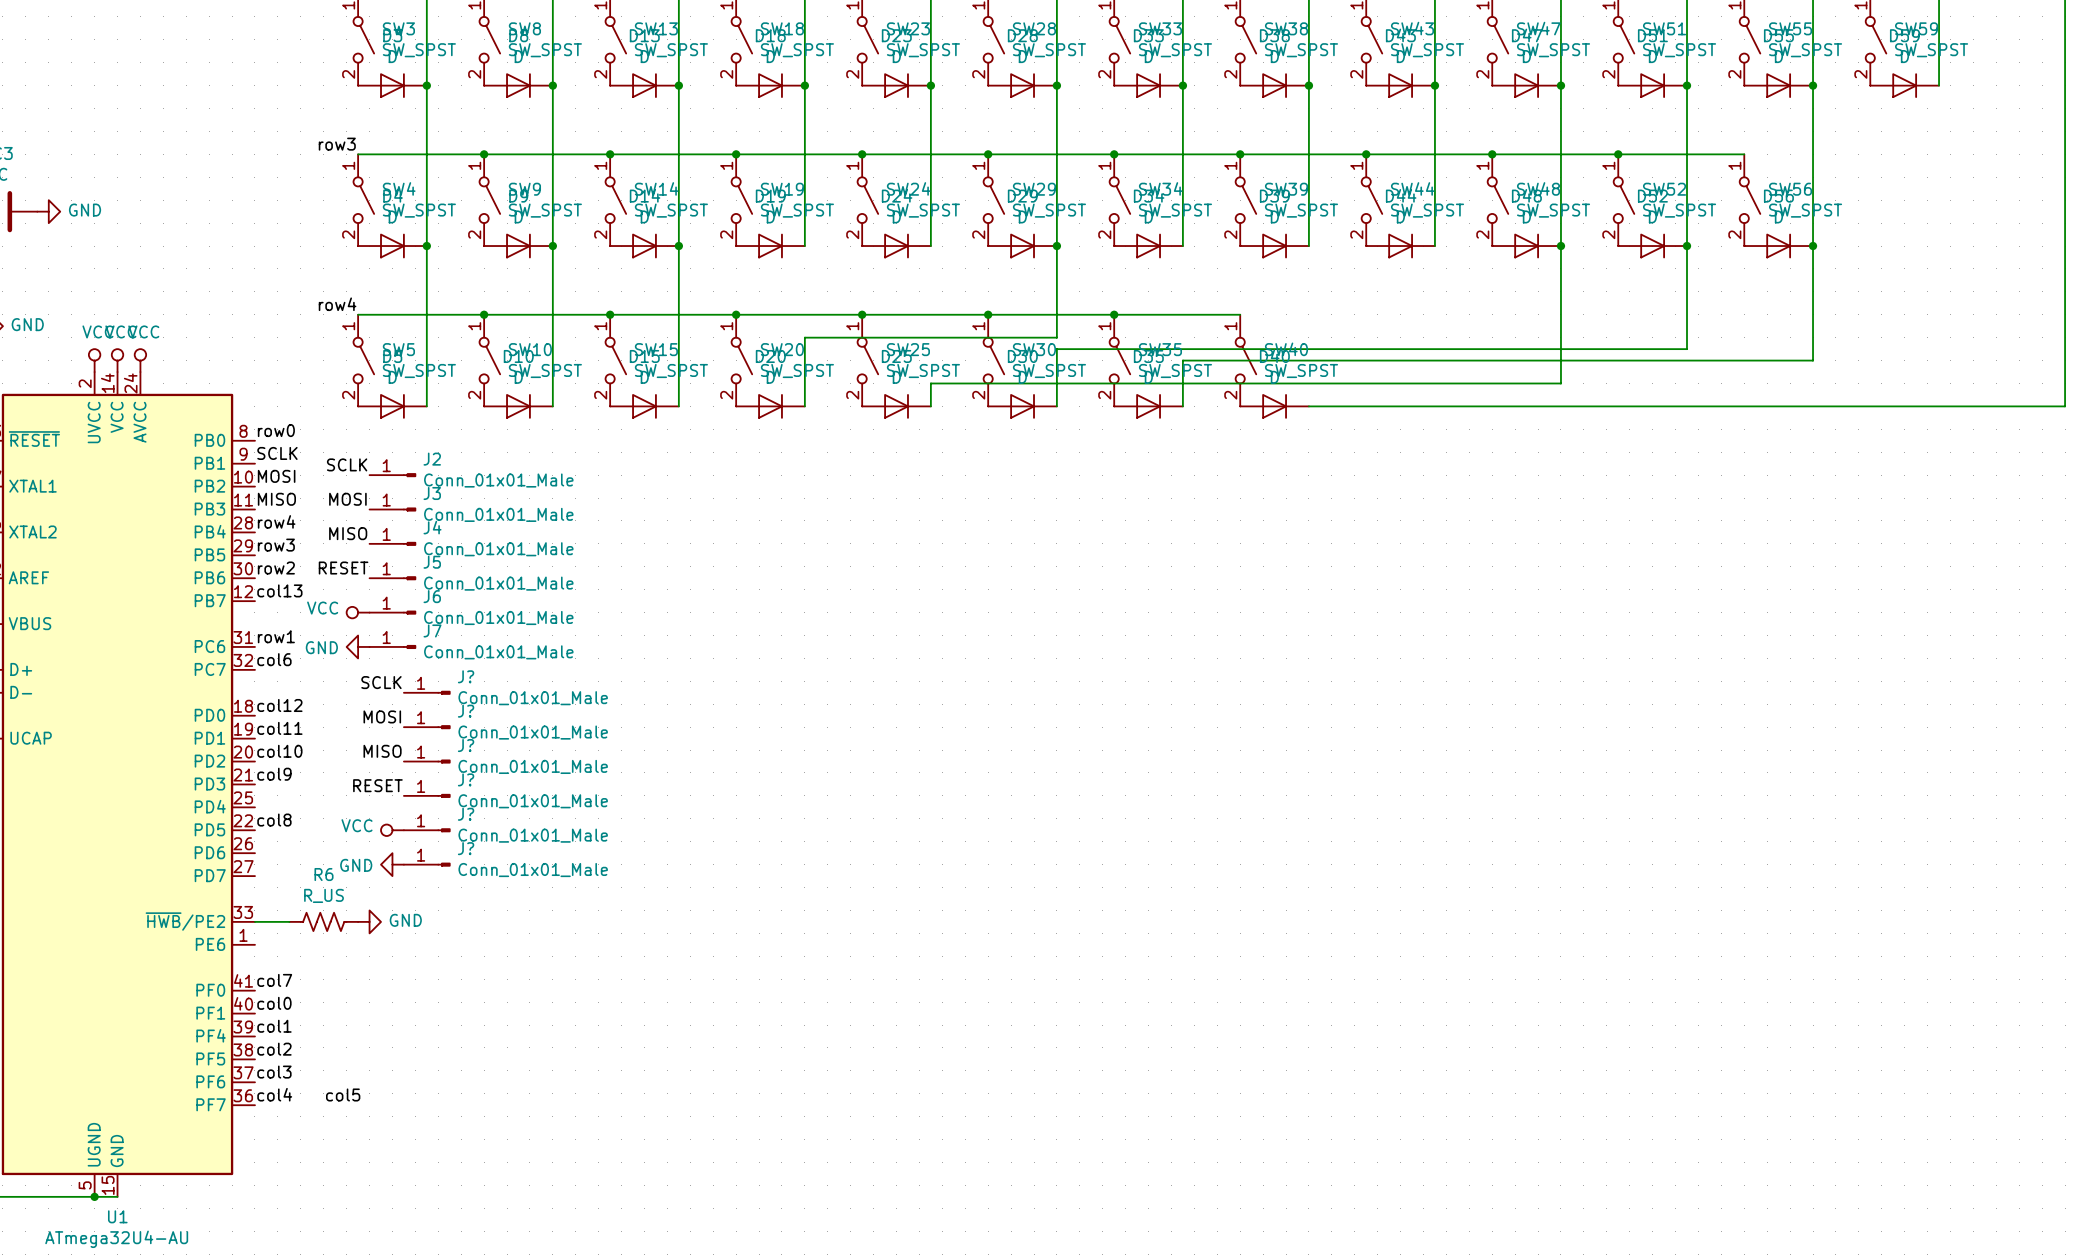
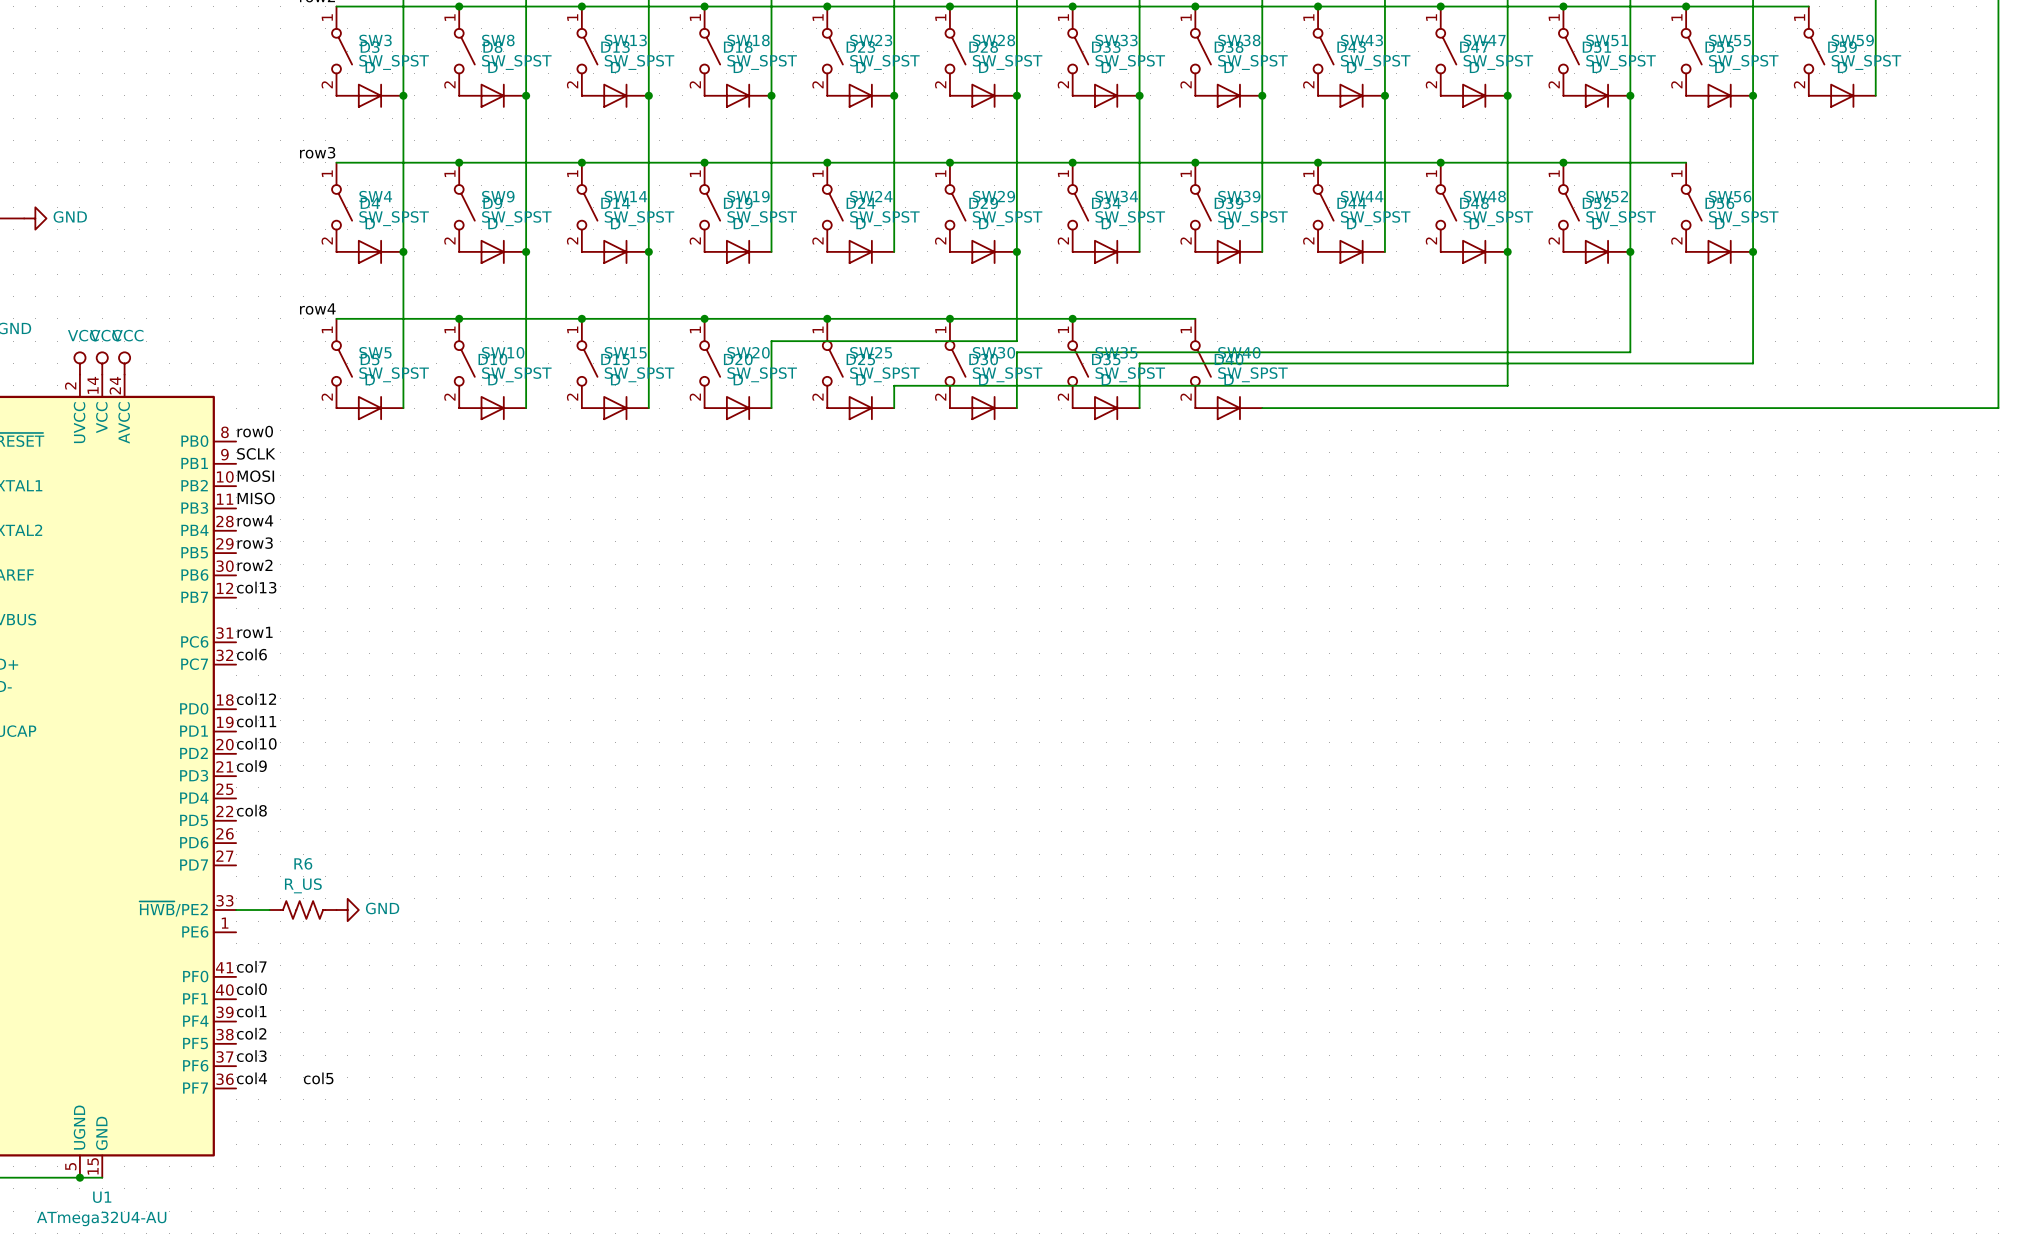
label: SCLK (347, 464) -> none
J2: Conn_01x01_Male (392, 475) -> none
label: MOSI (347, 499) -> none
J3: Conn_01x01_Male (392, 509) -> none
label: MISO (348, 533) -> none
J4: Conn_01x01_Male (392, 543) -> none
label: RESET (343, 568) -> none
J5: Conn_01x01_Male (392, 578) -> none
power symbol: VCC (358, 612) -> none
J6: Conn_01x01_Male (392, 612) -> none
power symbol: GND (358, 646) -> none
J7: Conn_01x01_Male (392, 646) -> none
label: SCLK (381, 682) -> none
J?: Conn_01x01_Male (427, 692) -> none
label: MOSI (382, 716) -> none
J?: Conn_01x01_Male (427, 727) -> none
label: MISO (382, 751) -> none
J?: Conn_01x01_Male (427, 761) -> none
label: RESET (377, 785) -> none
J?: Conn_01x01_Male (427, 795) -> none
power symbol: VCC (392, 830) -> none
J?: Conn_01x01_Male (427, 830) -> none
power symbol: GND (392, 864) -> none
J?: Conn_01x01_Male (427, 864) -> none

